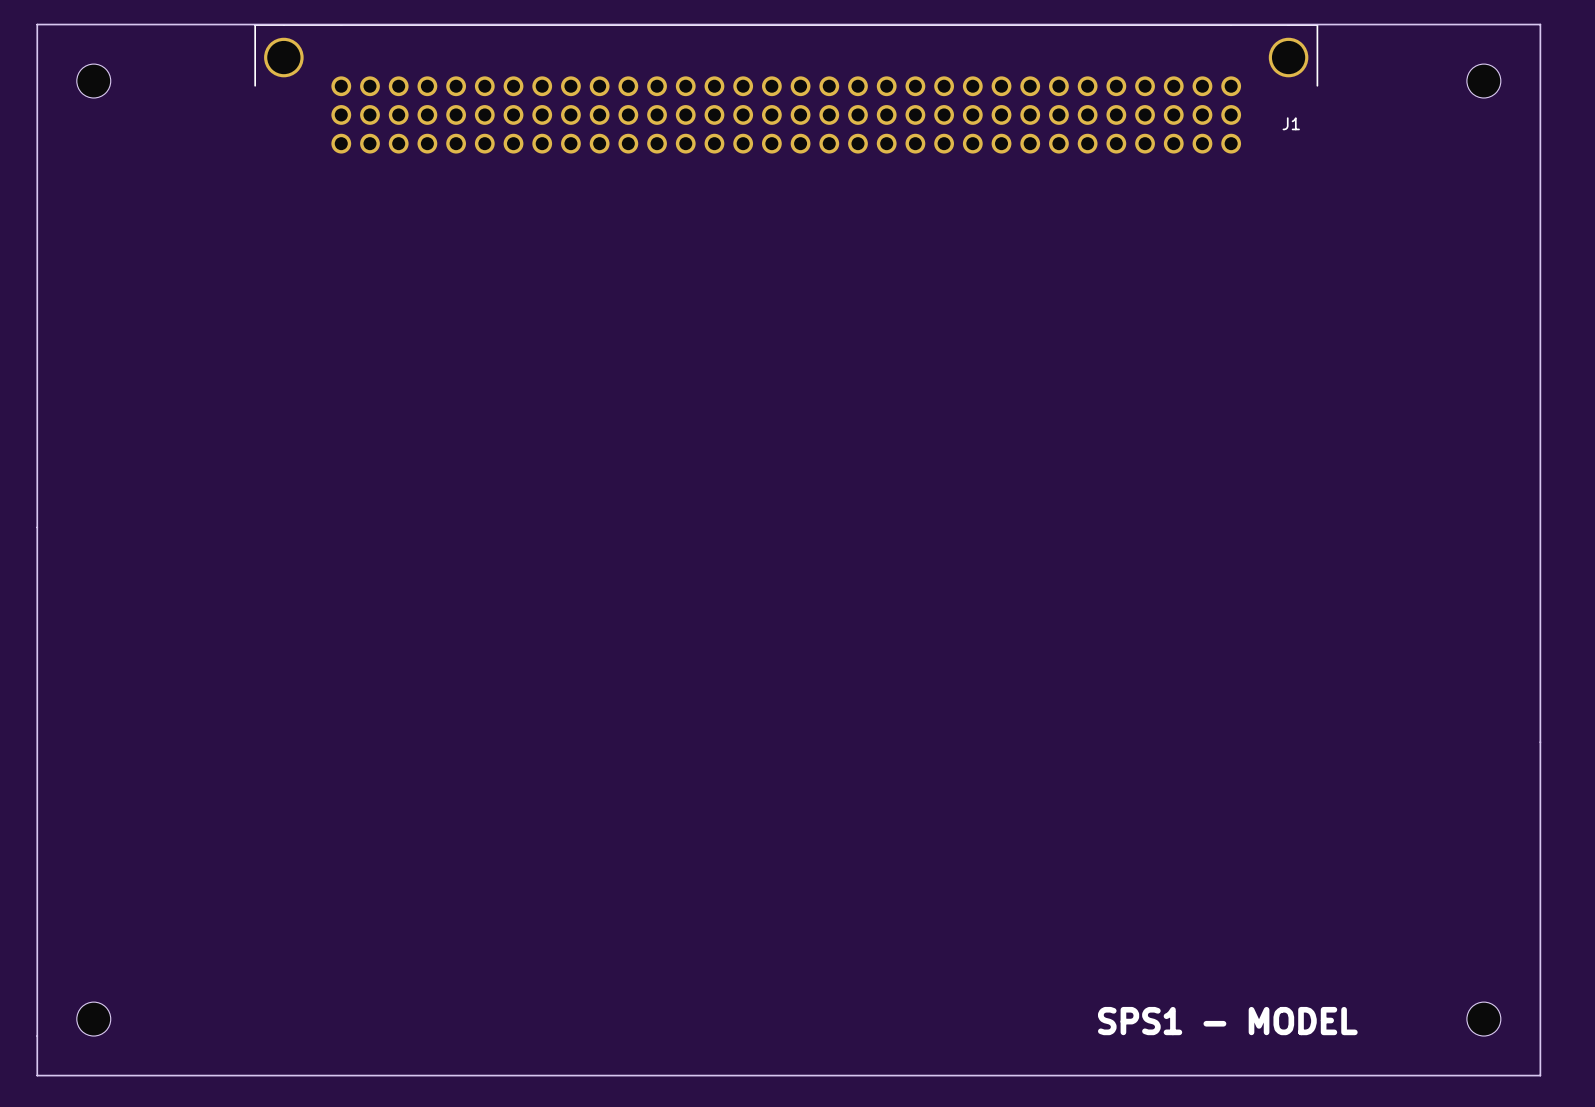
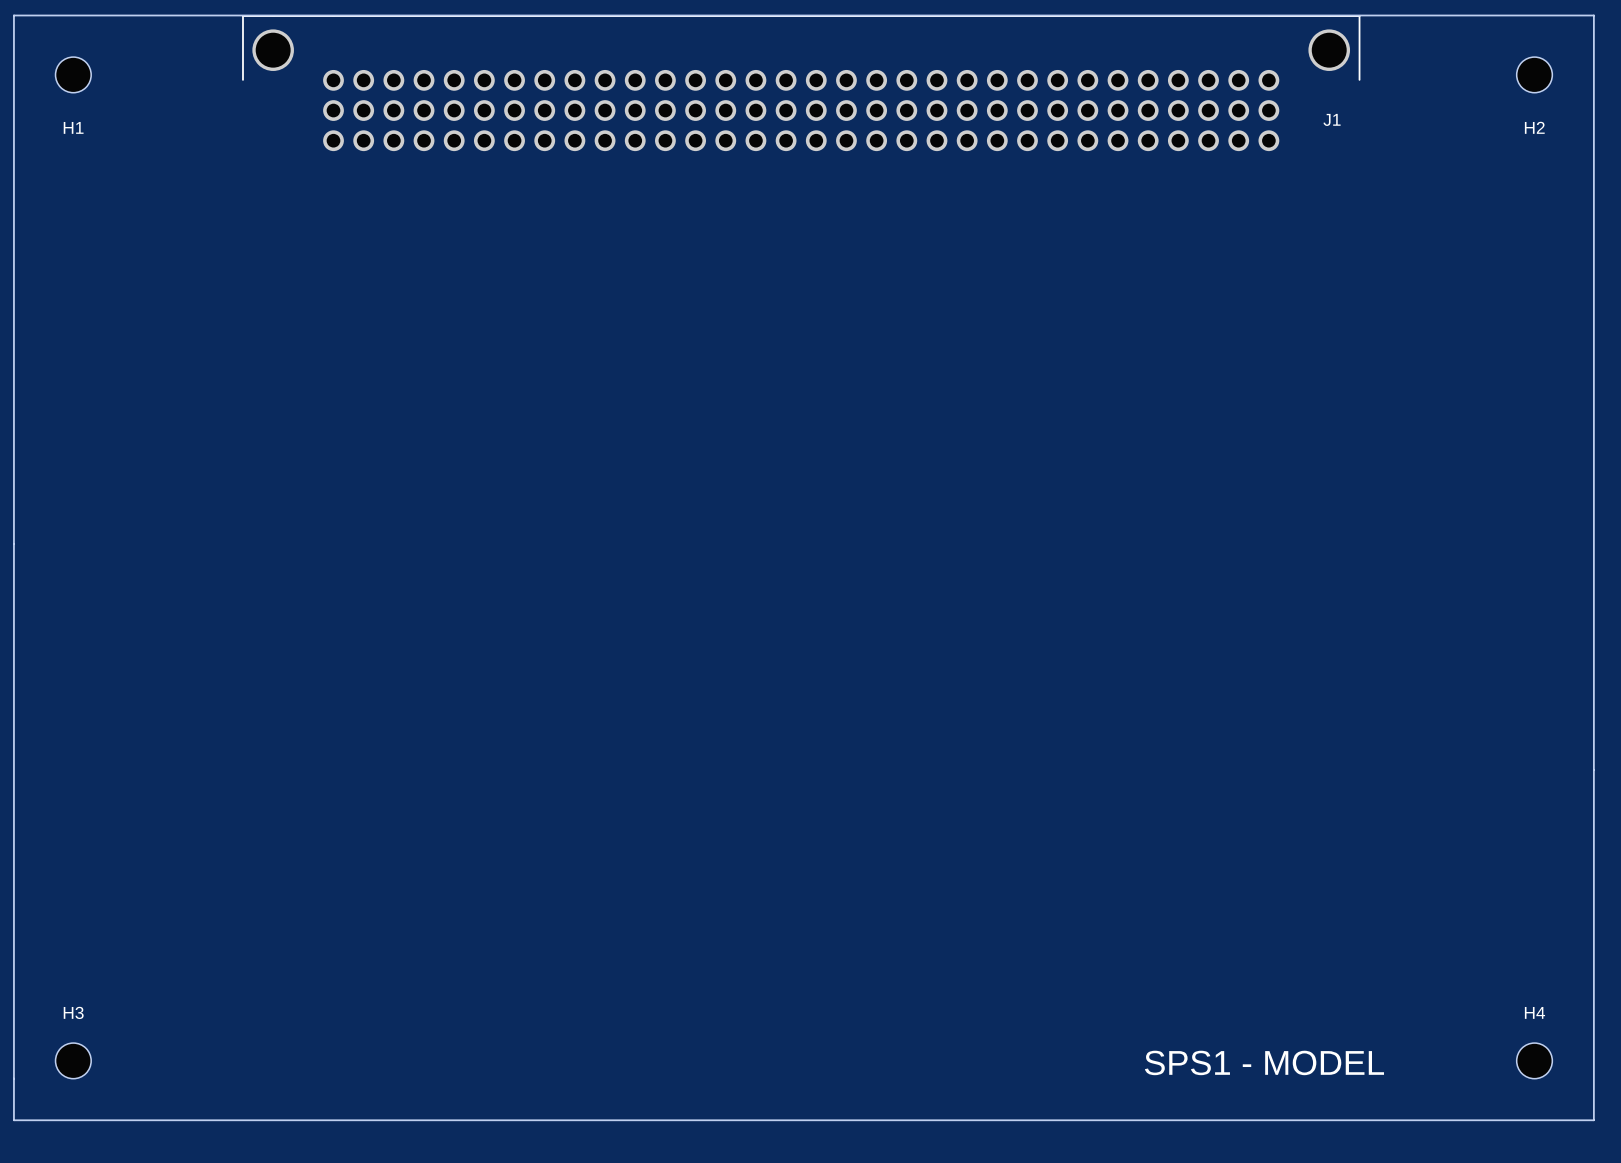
H1 name: none -> H1 (73, 127)
H2 name: none -> H2 (1534, 127)
H3 name: none -> H3 (73, 1012)
H4 name: none -> H4 (1534, 1012)

